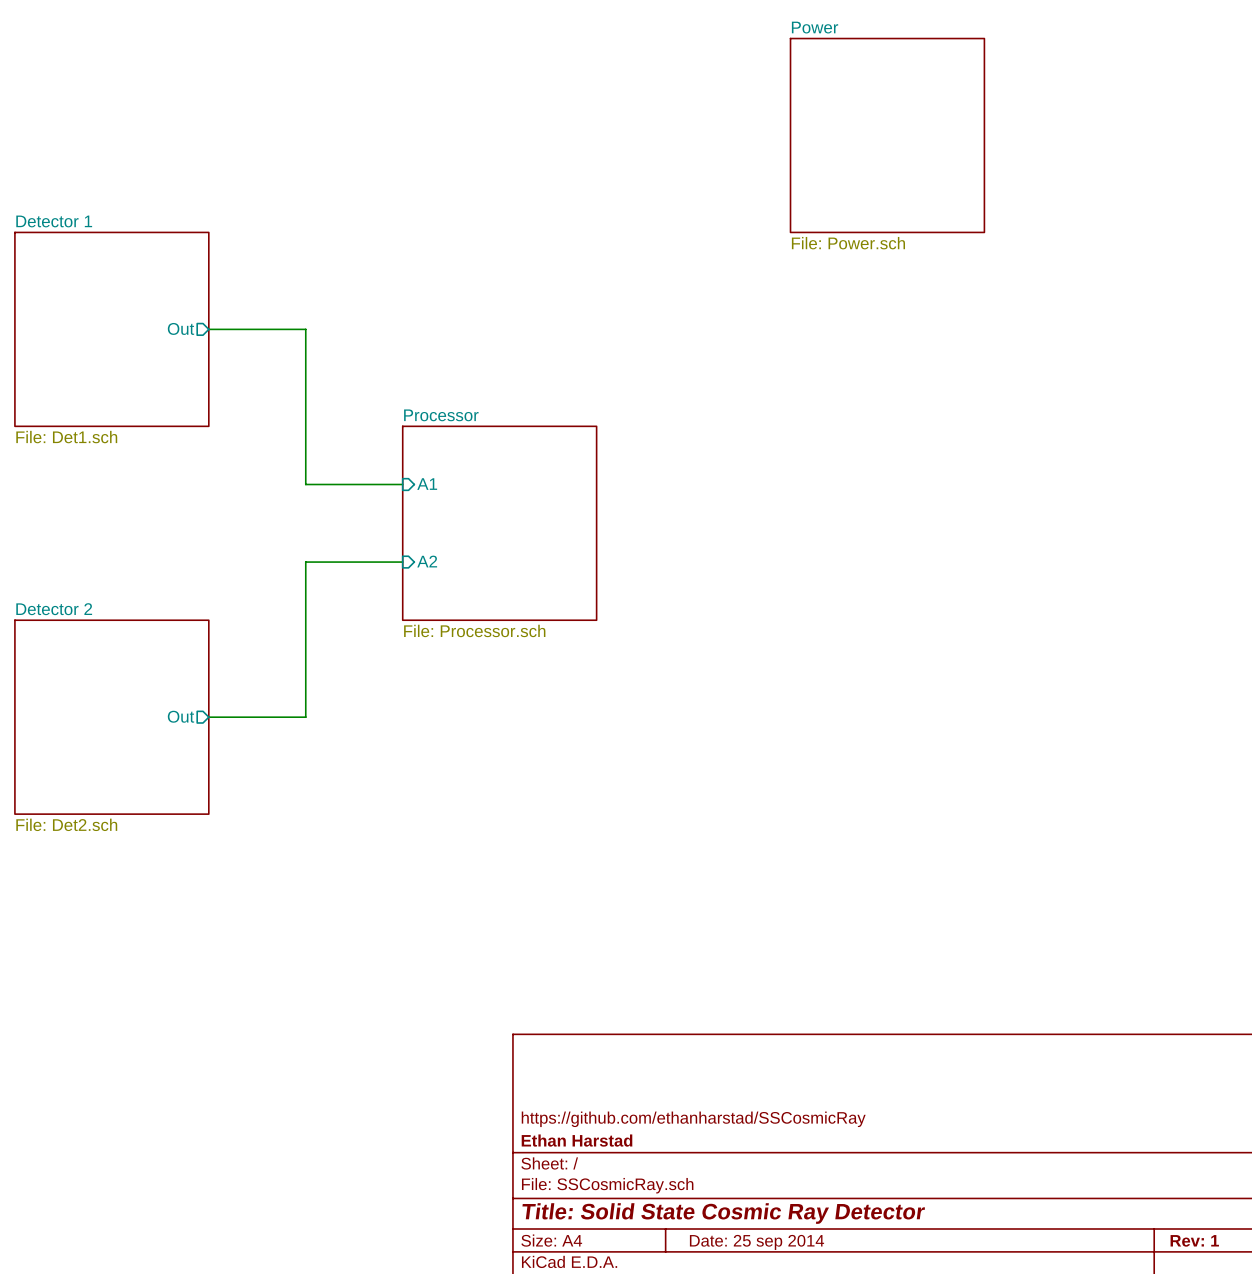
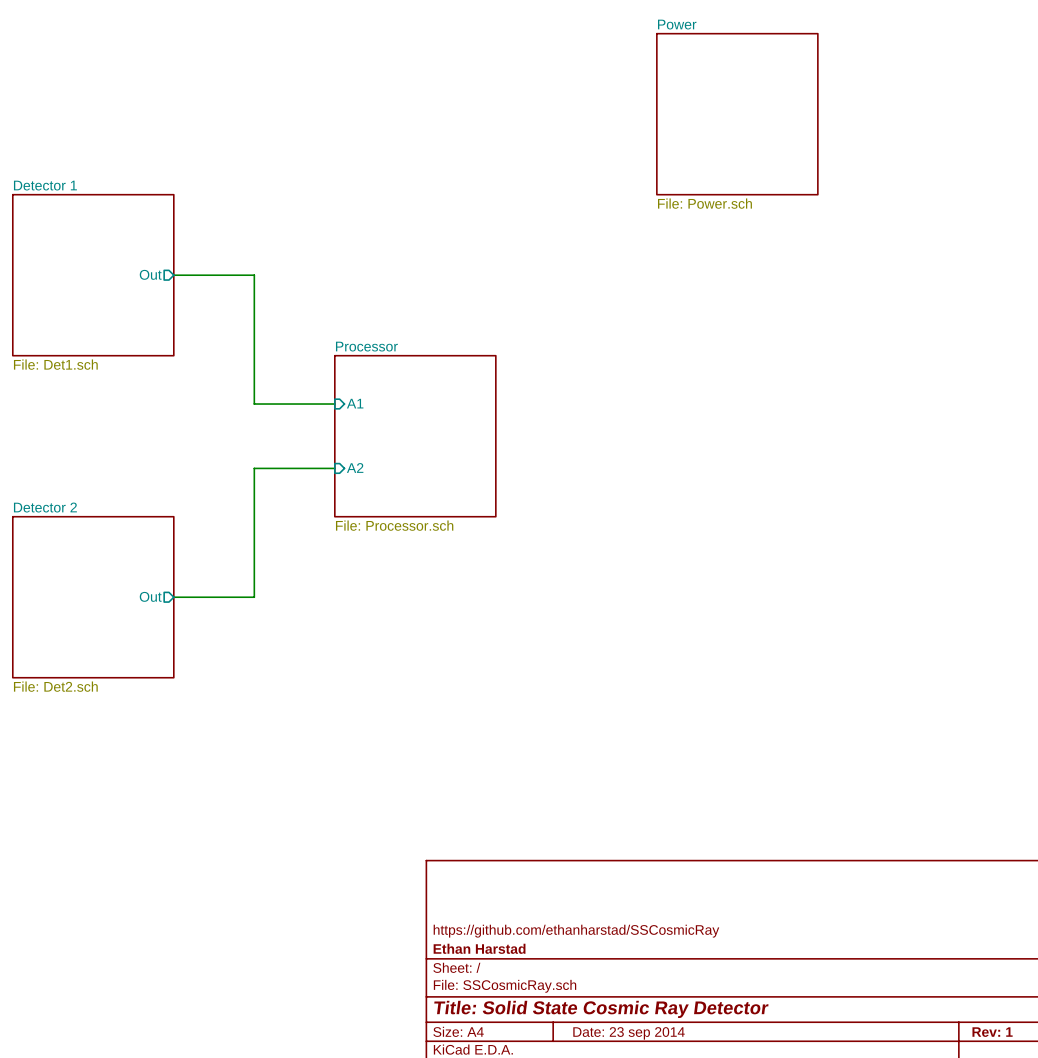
title block: Date: 25 sep 2014 (756, 1242) -> Date: 23 sep 2014 (629, 1033)

